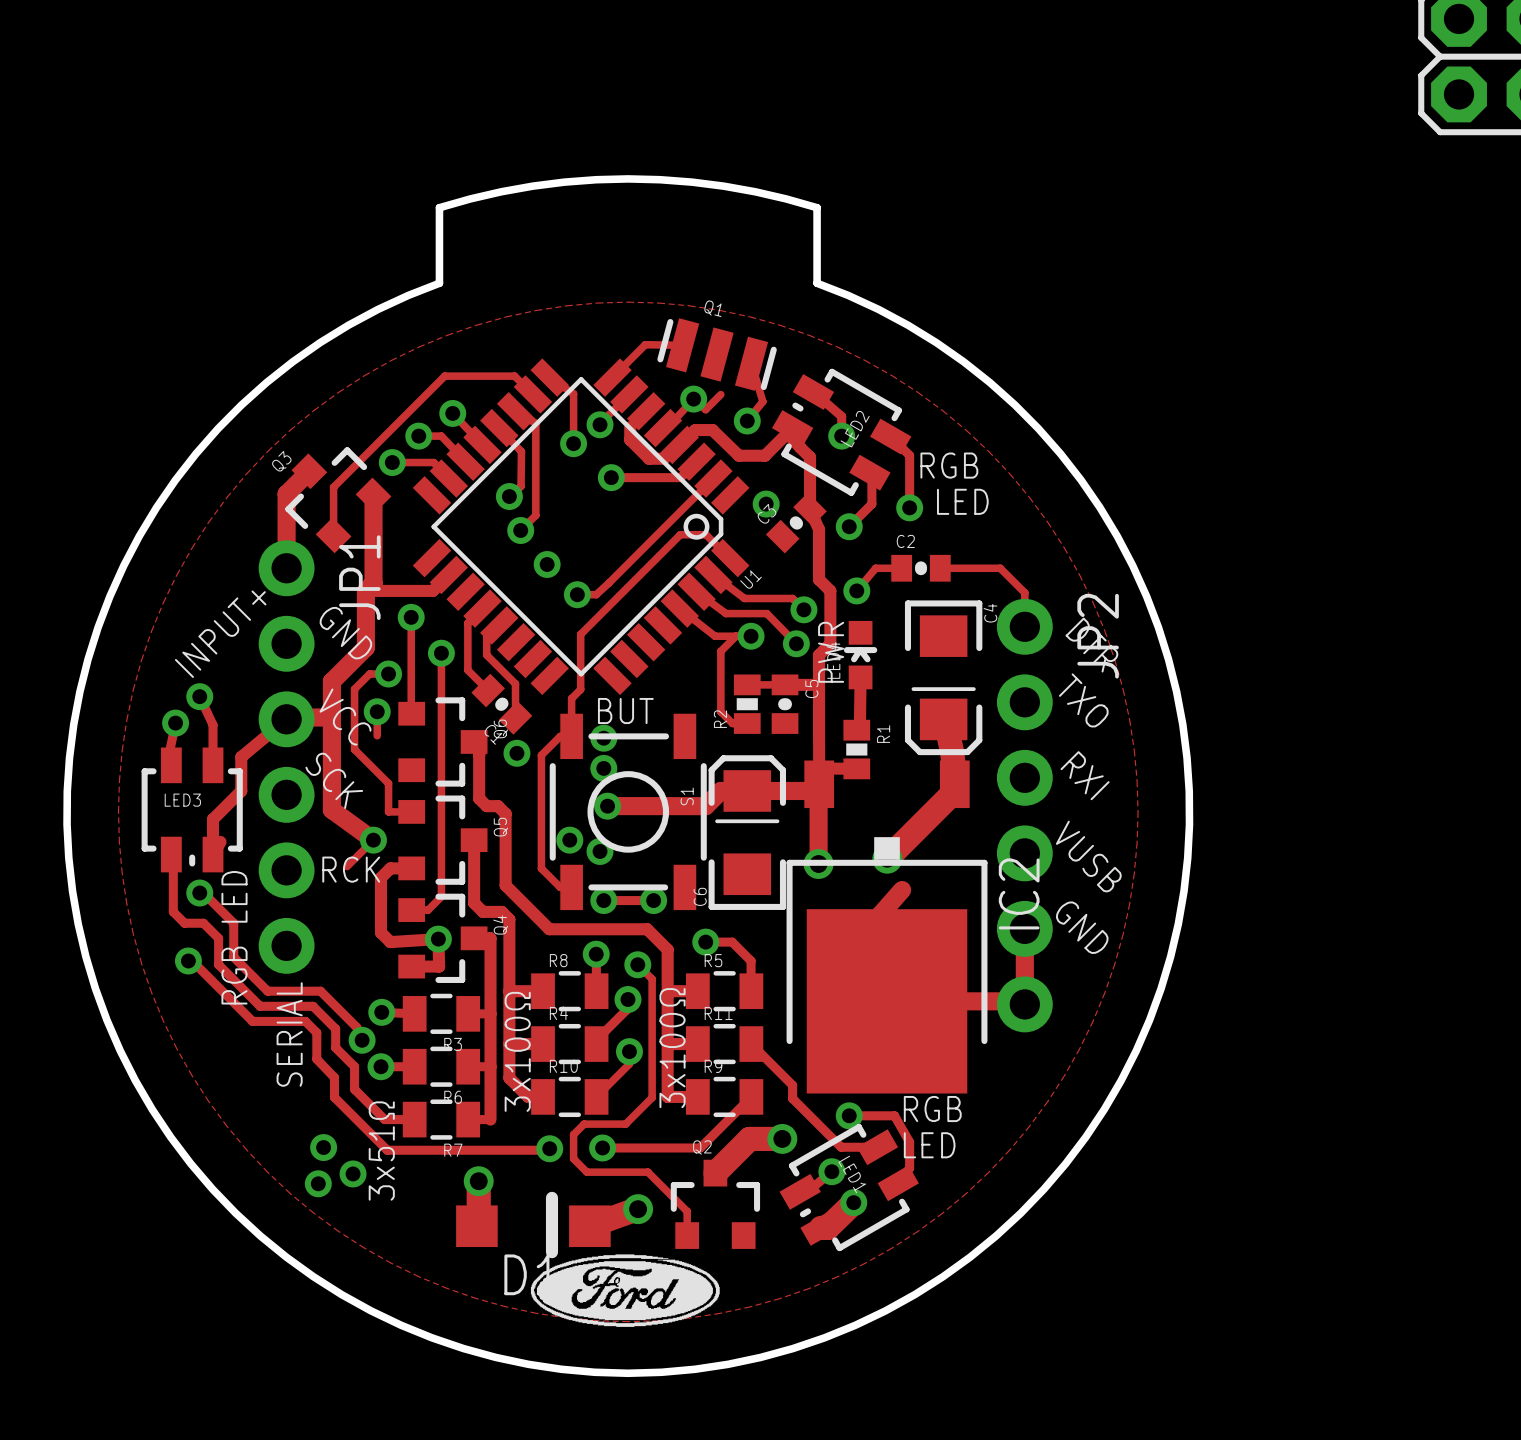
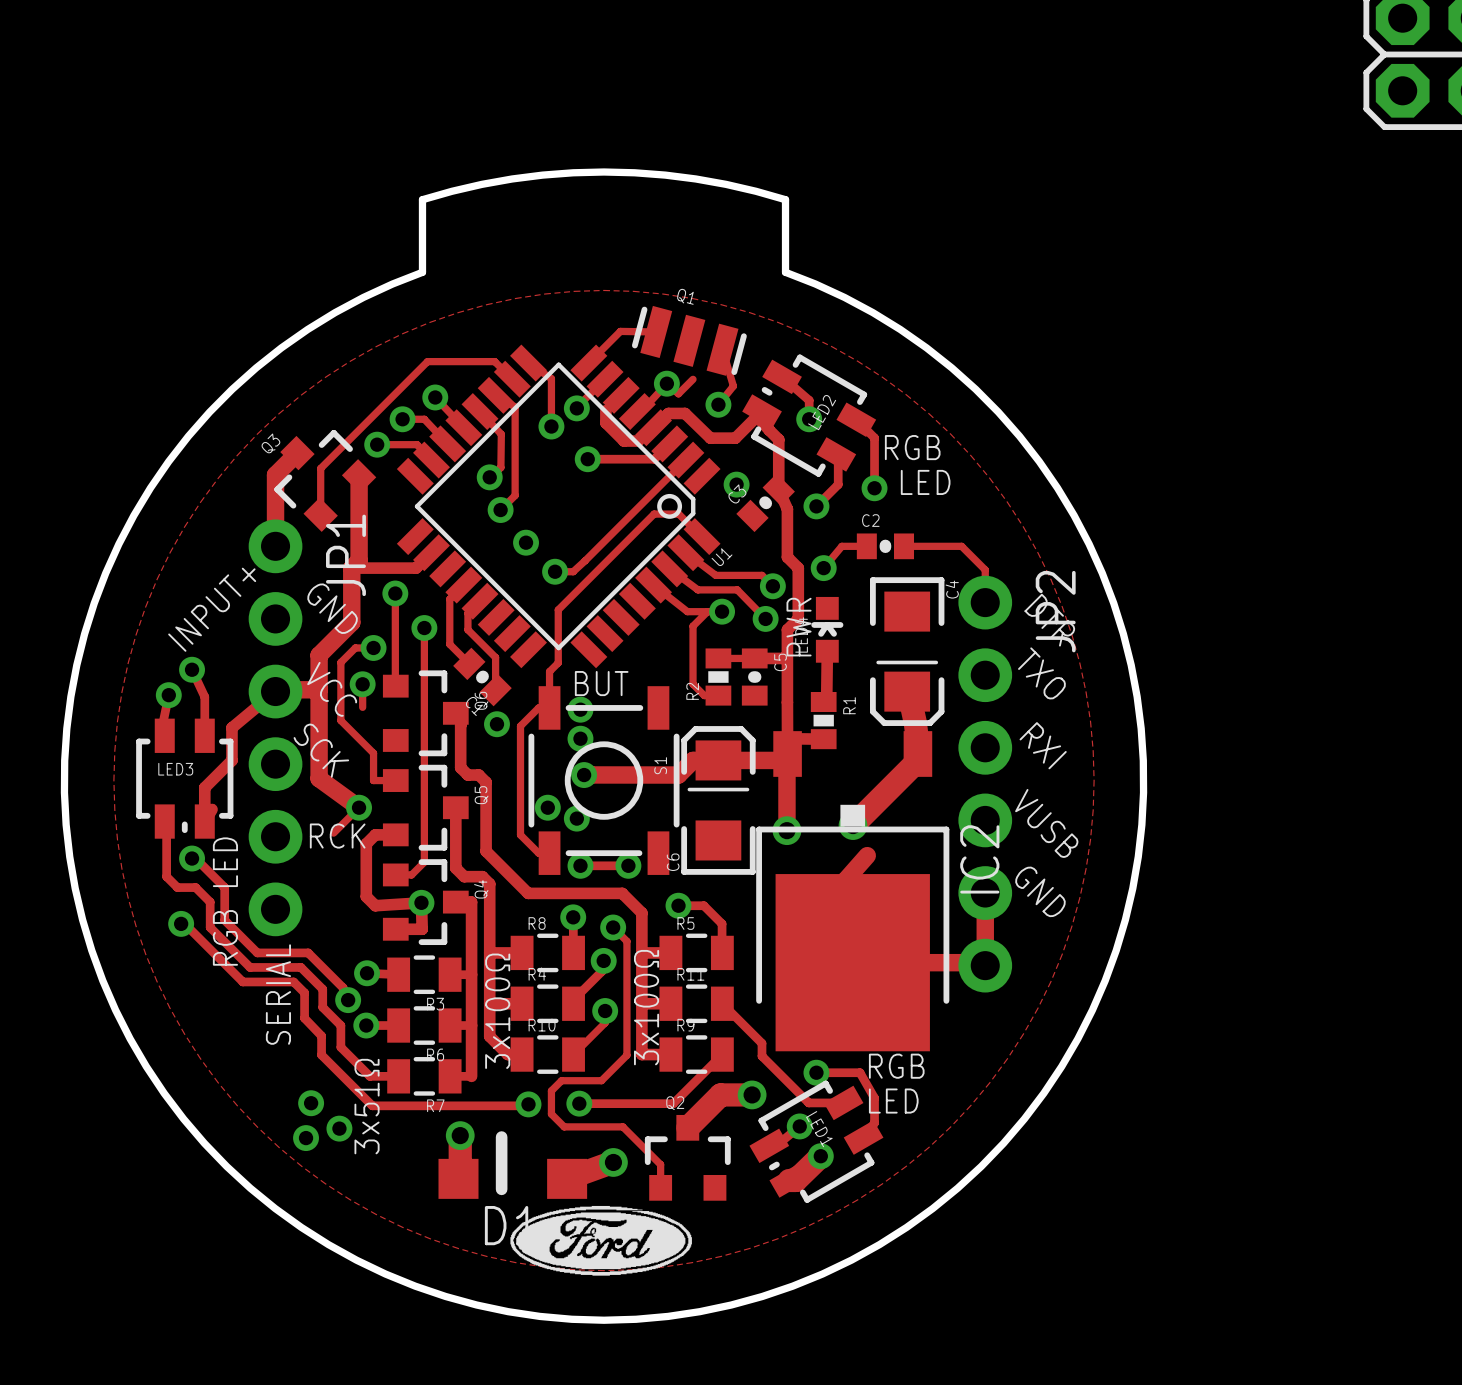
line: (551, 1197) (551, 1252) -> (501, 1137) (501, 1189)

